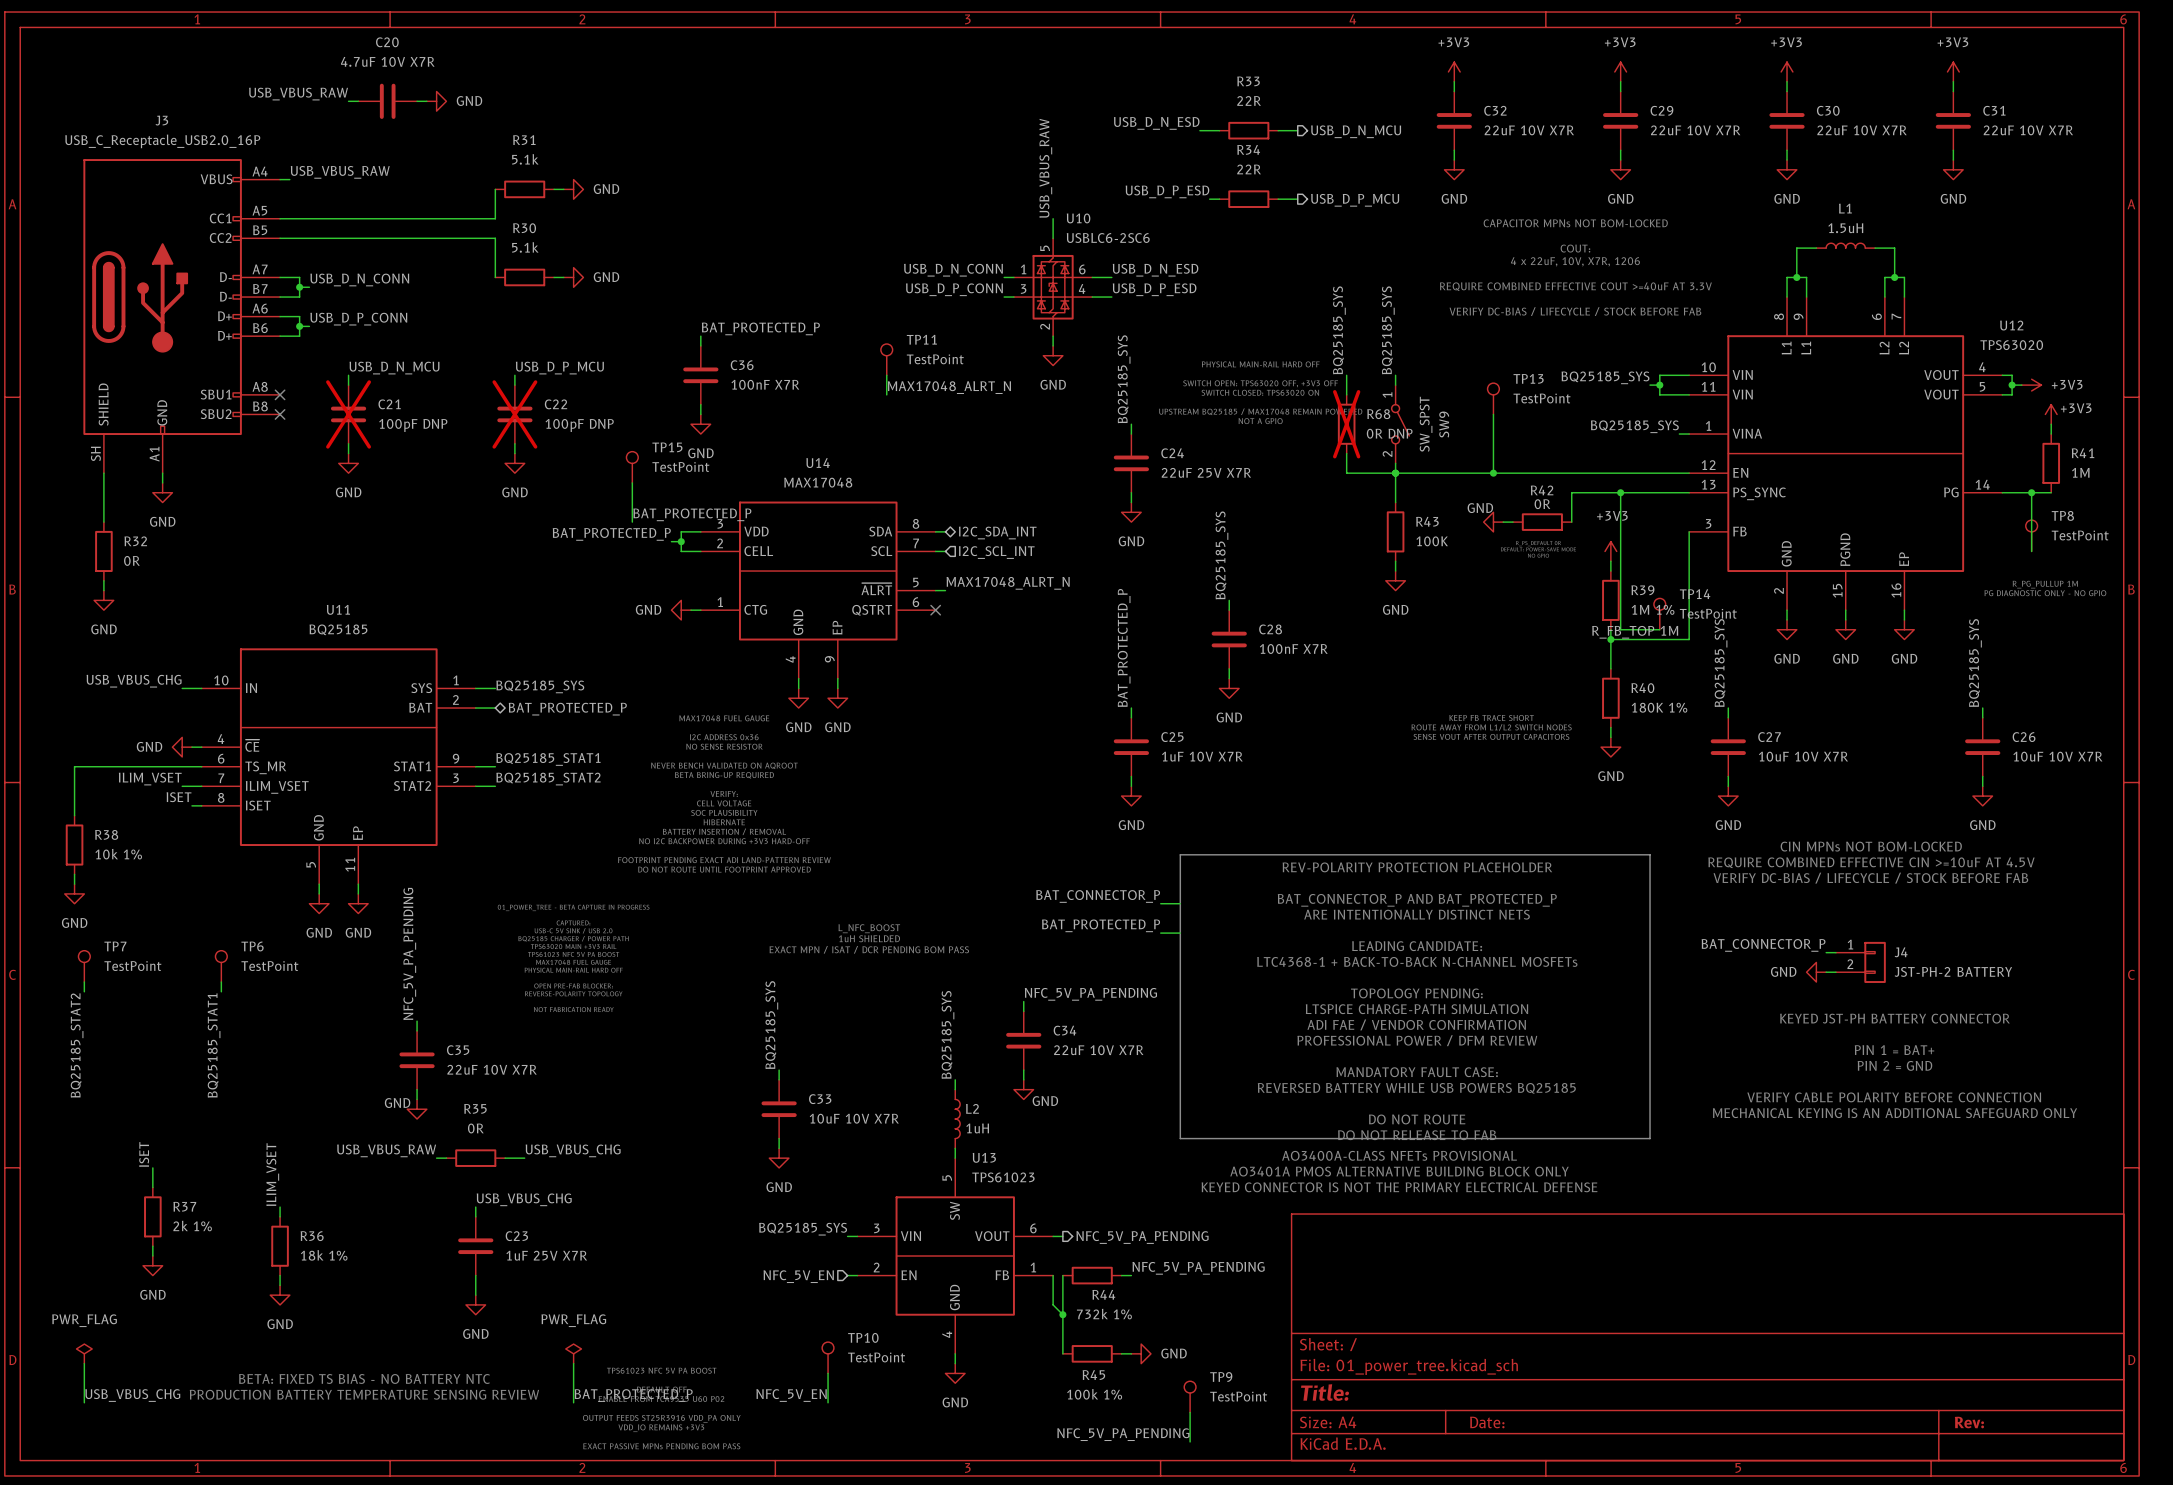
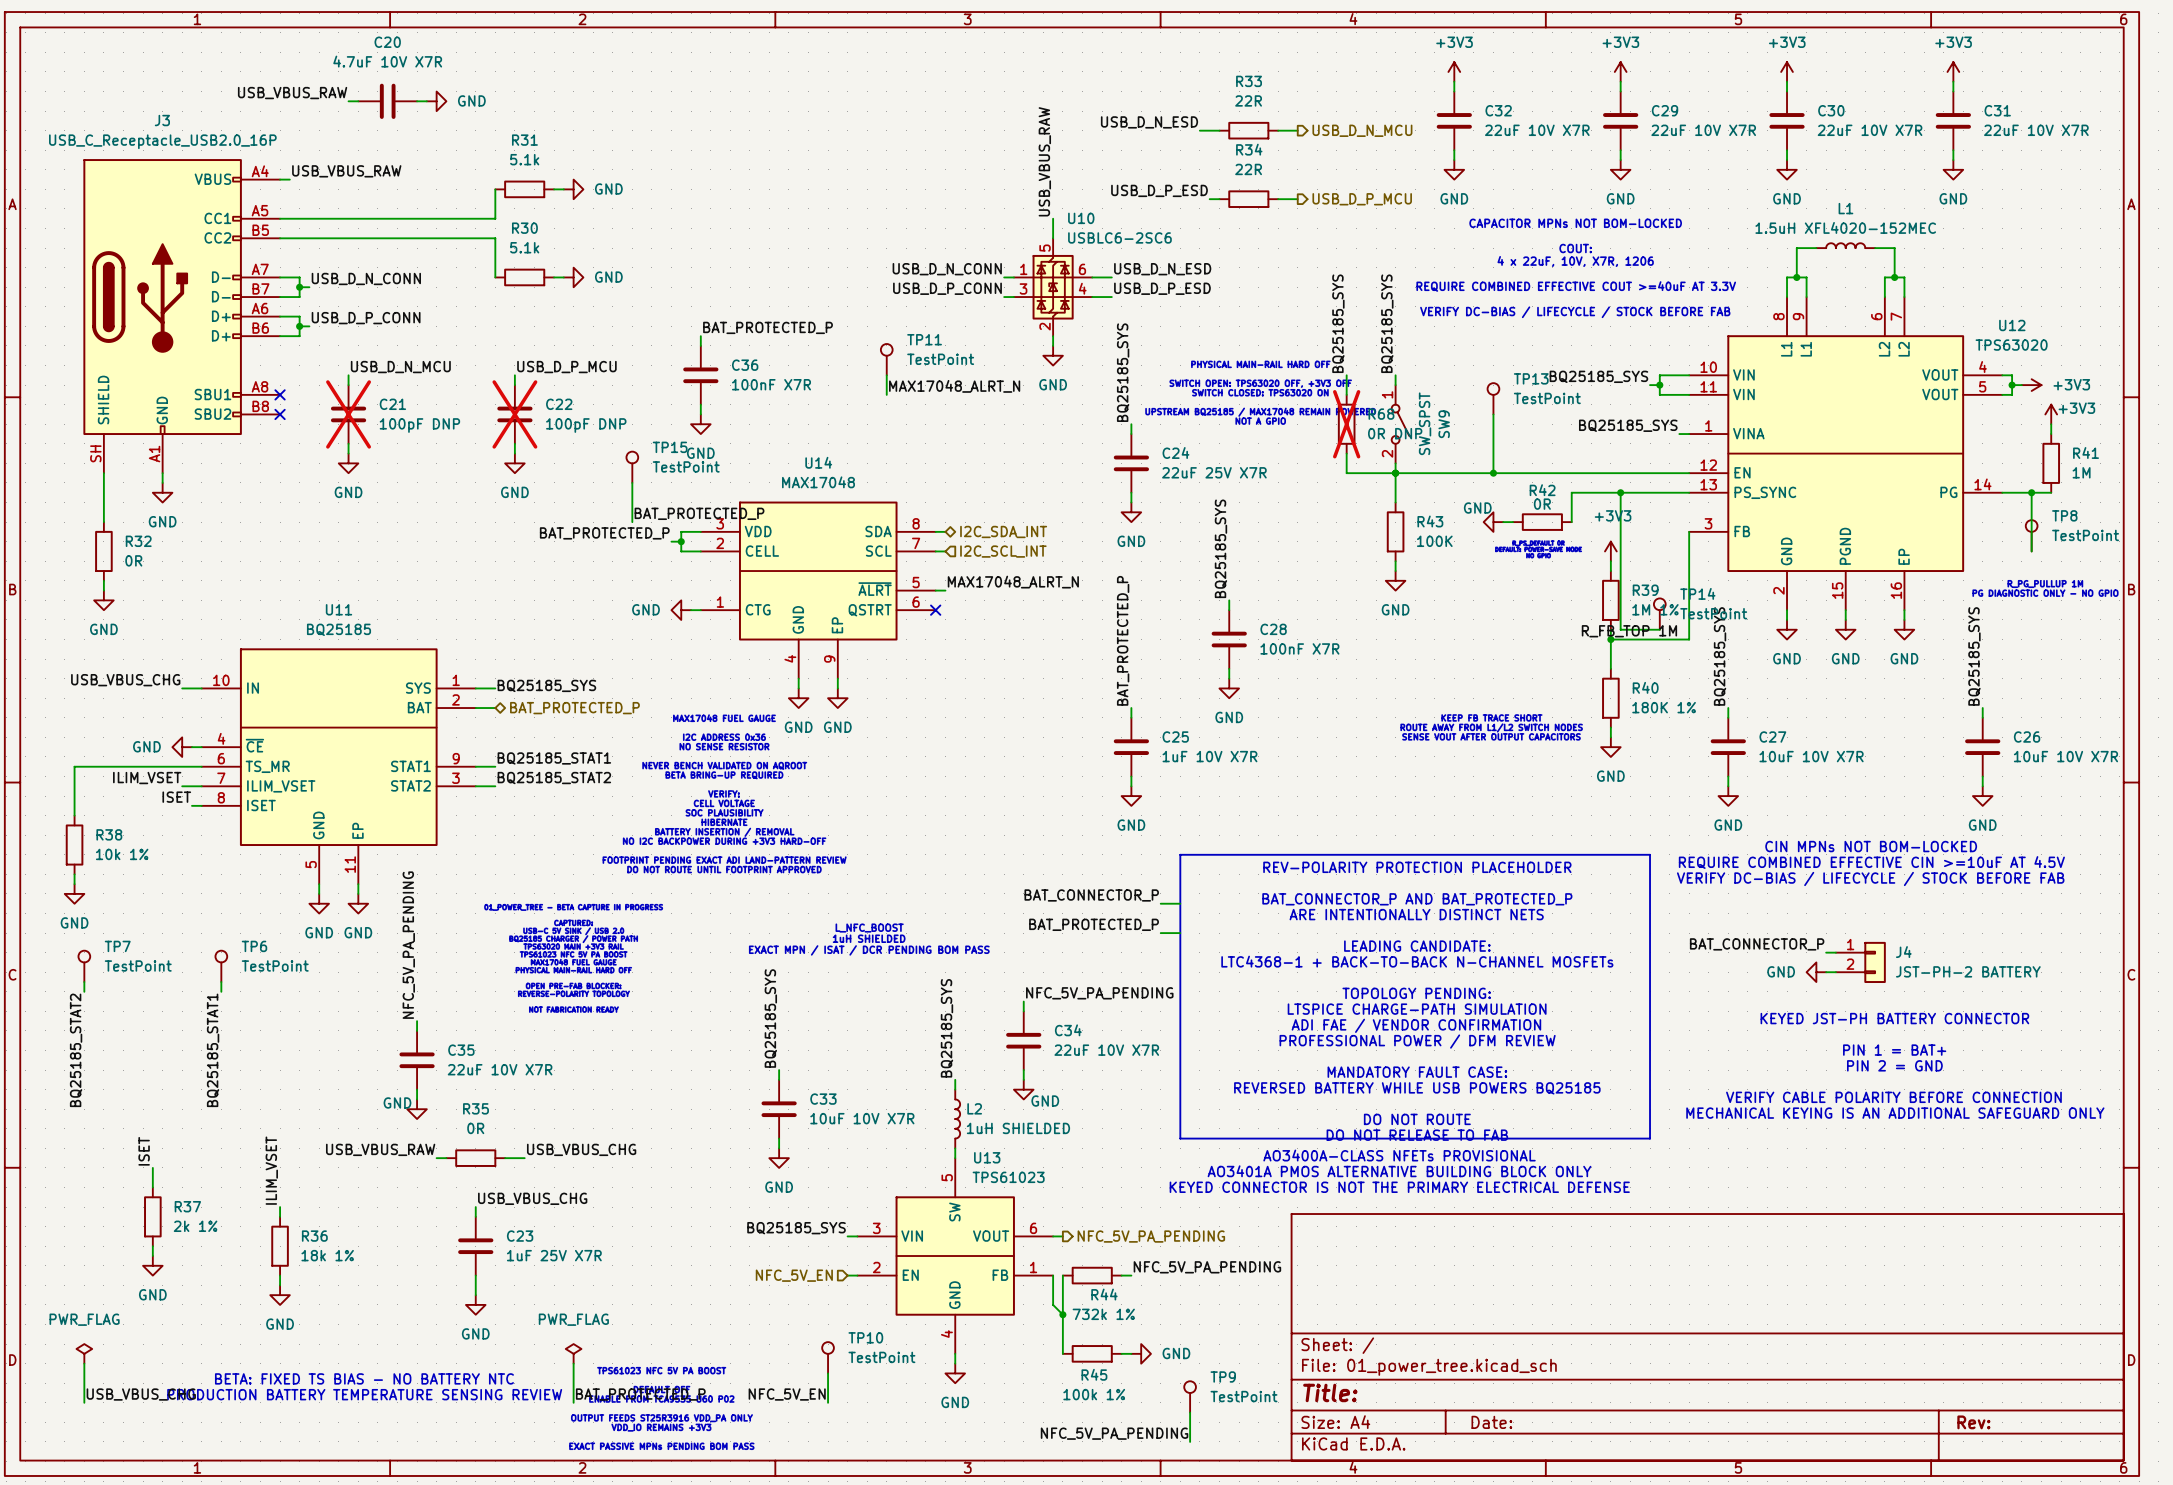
L1 value: 1.5uH (1845, 228) -> 1.5uH XFL4020-152MEC (1845, 227)
L2 value: 1uH (977, 1128) -> 1uH SHIELDED (1018, 1128)

